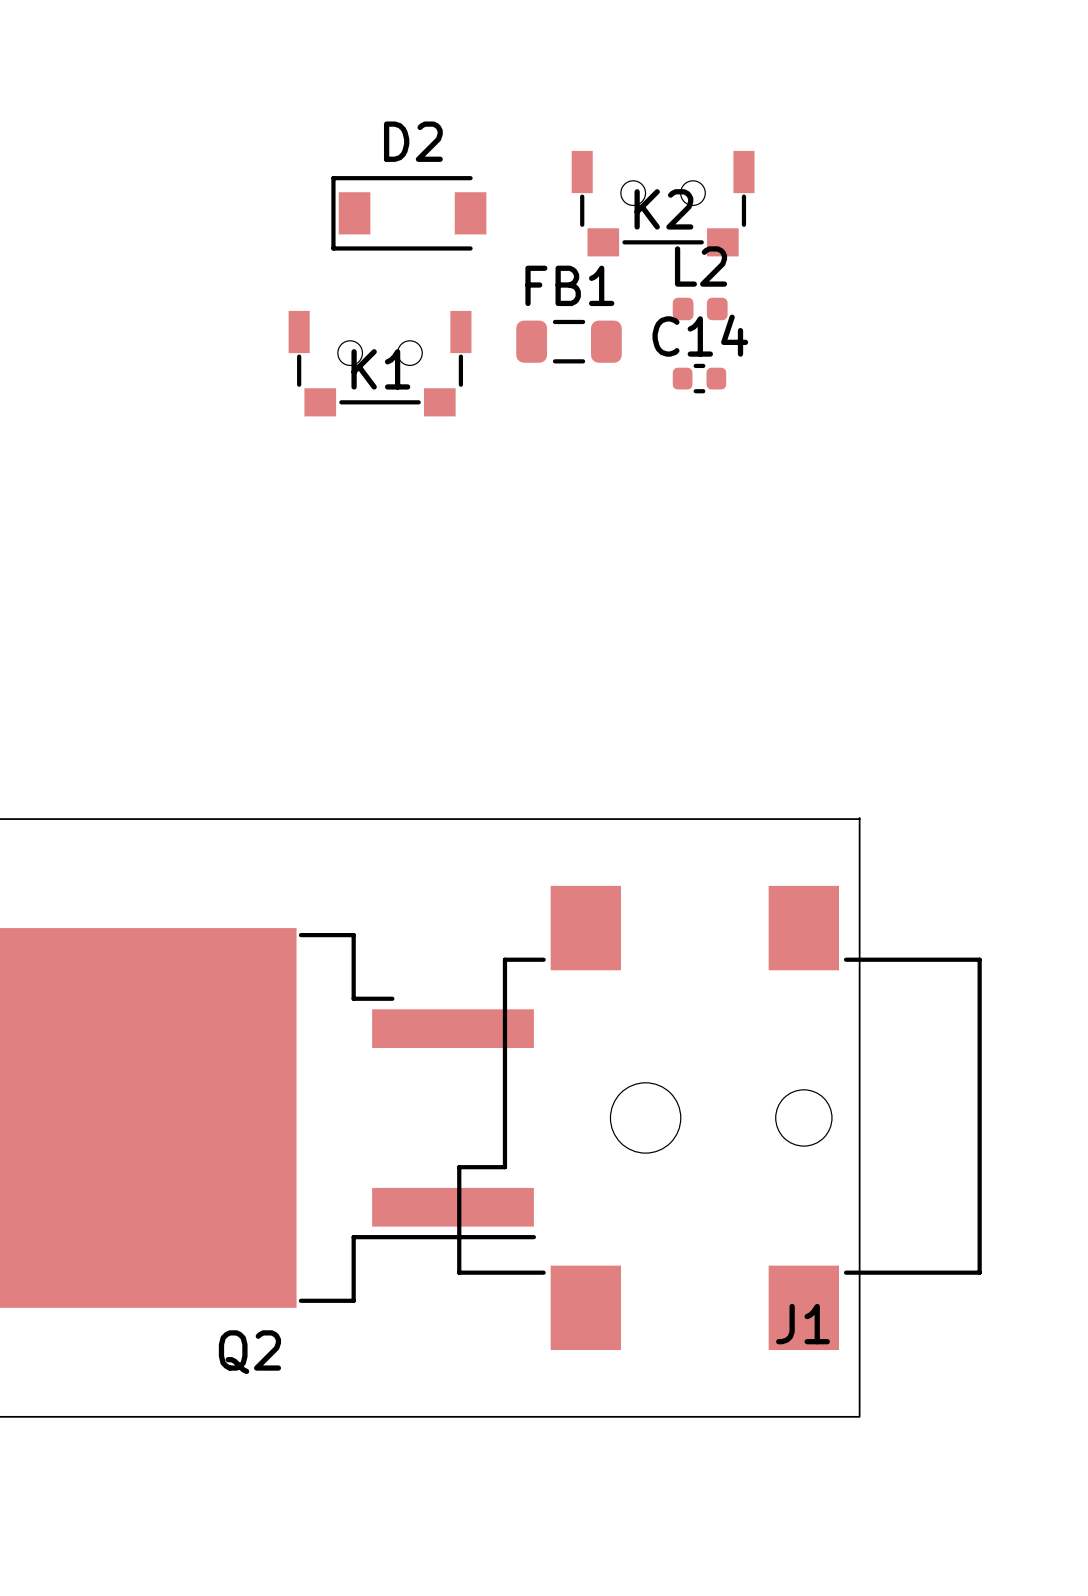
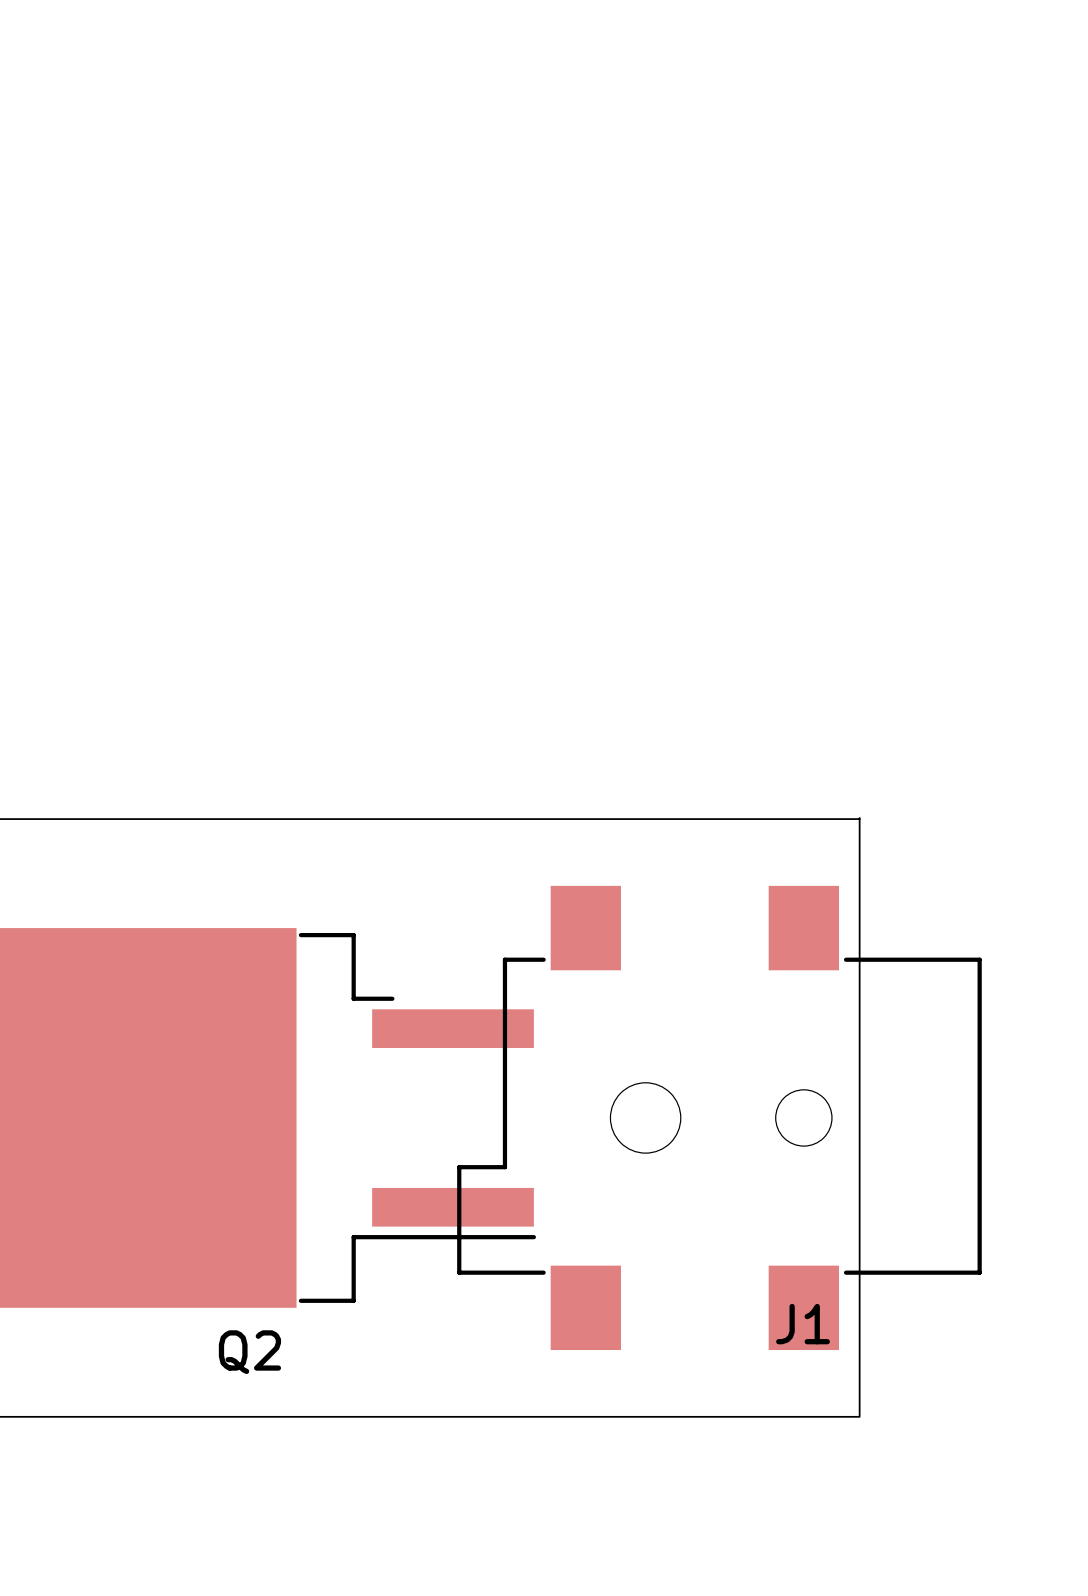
K2: (663, 203) -> none
D2: (408, 213) -> none
L2: (700, 308) -> none
FB1: (569, 341) -> none
K1: (380, 363) -> none
C14: (699, 378) -> none

